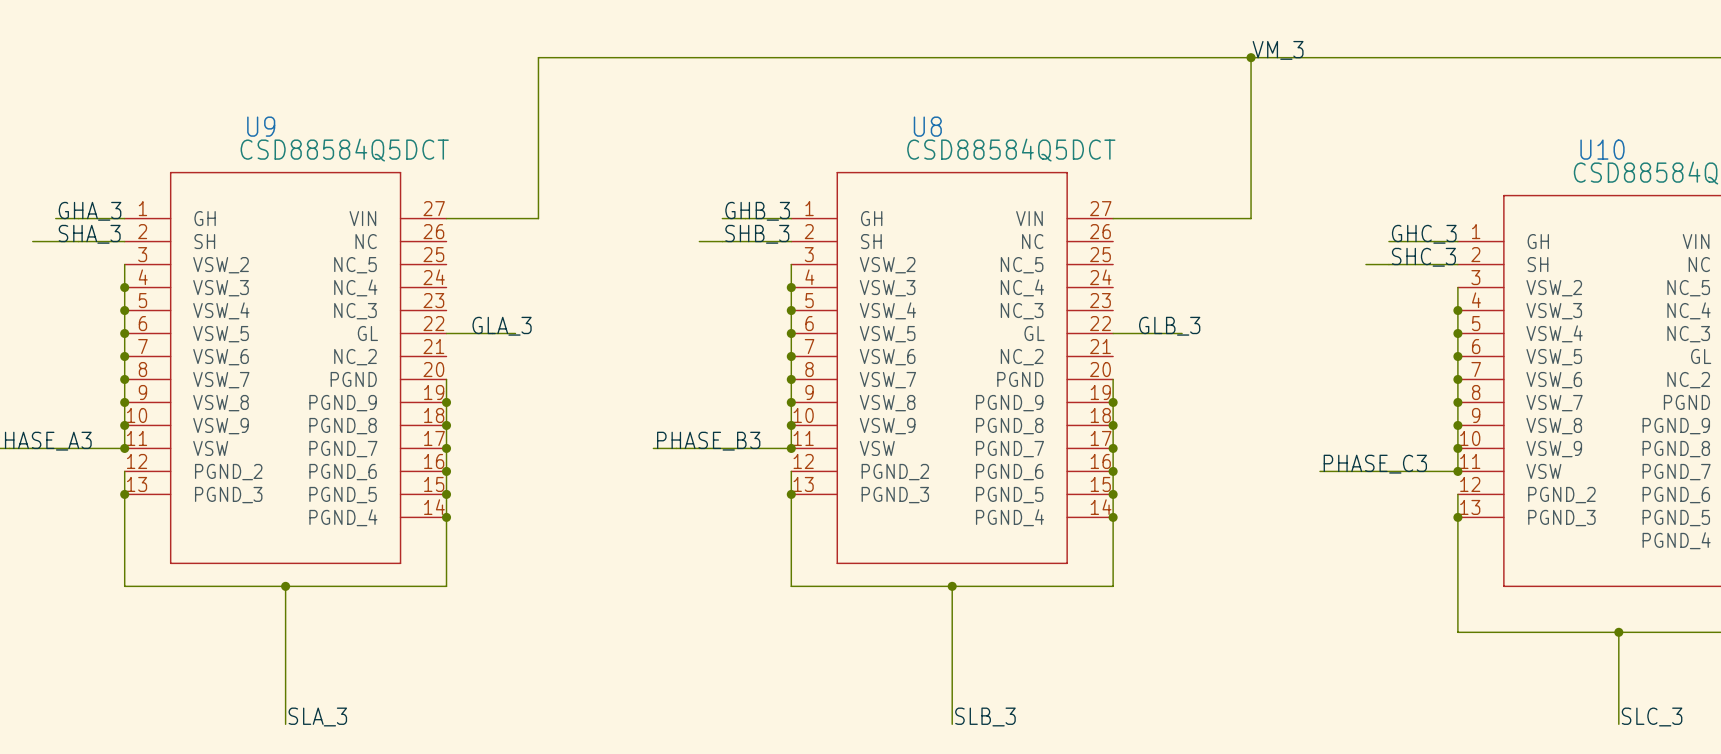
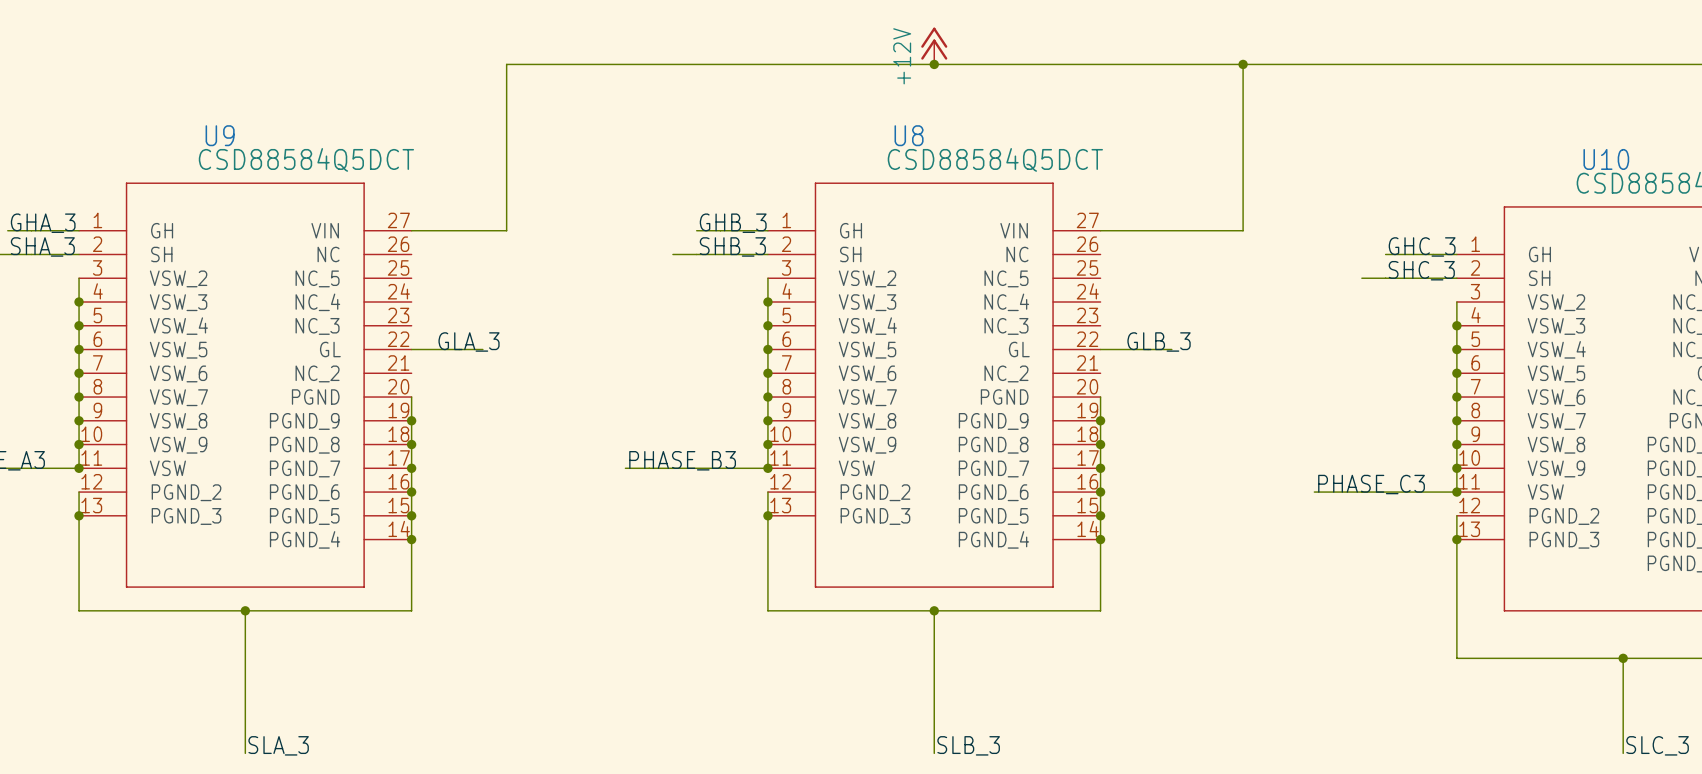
power symbol: none -> +12V (934, 46)
label: VM_3 (1278, 50) -> none
junction: none -> (934, 64)

